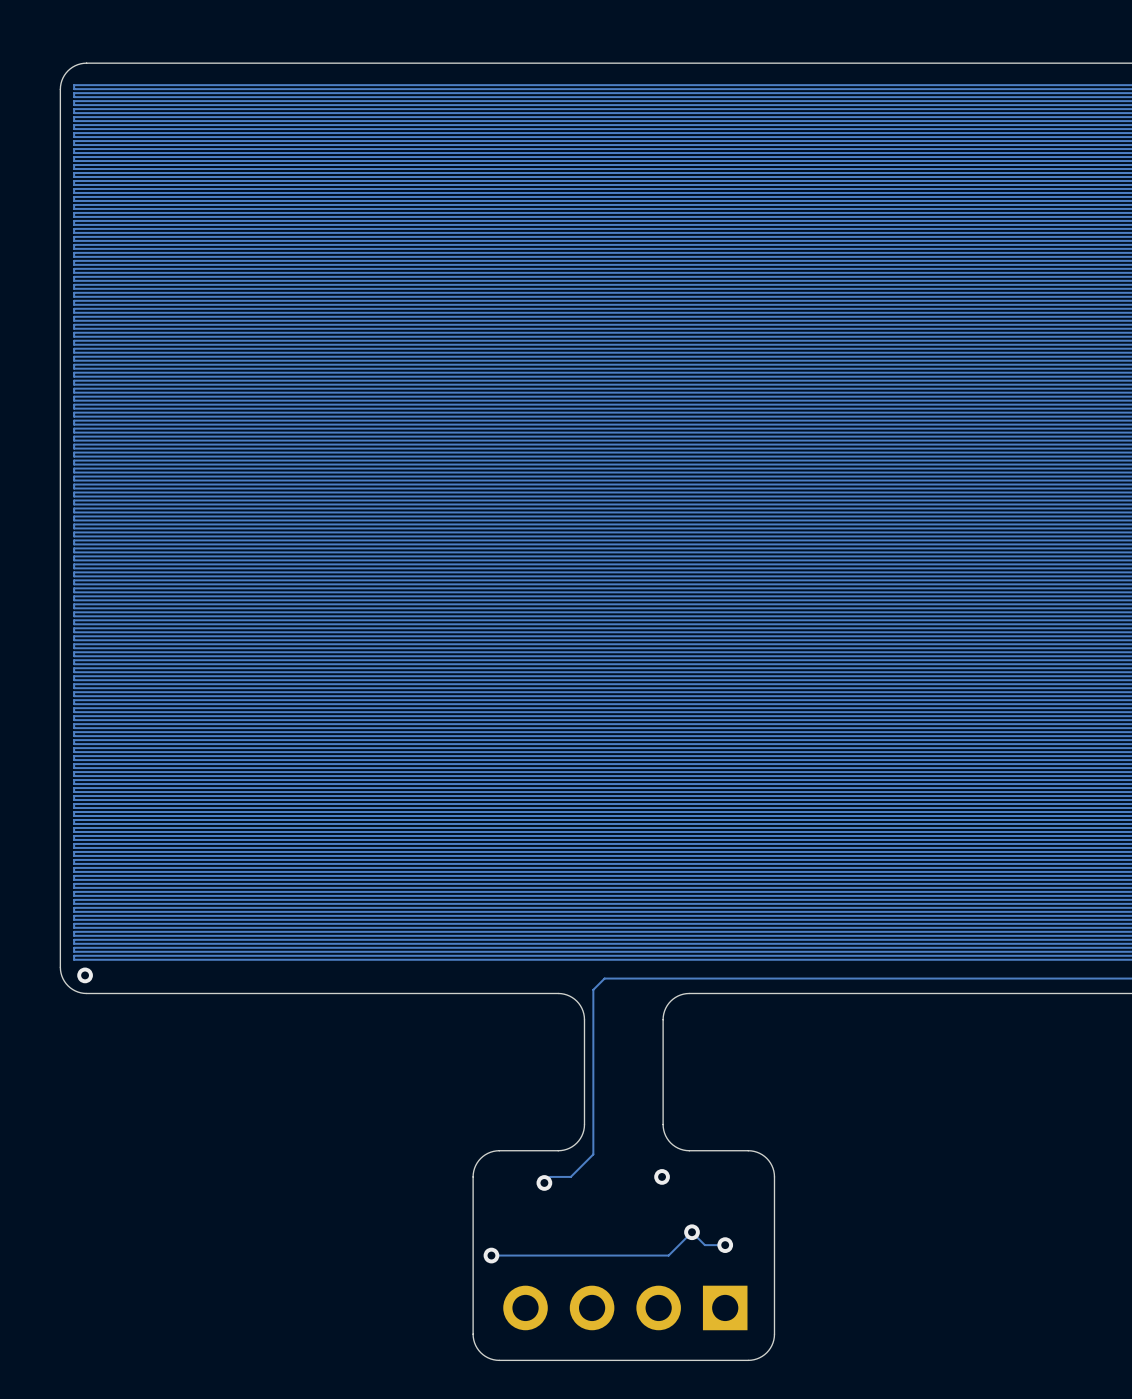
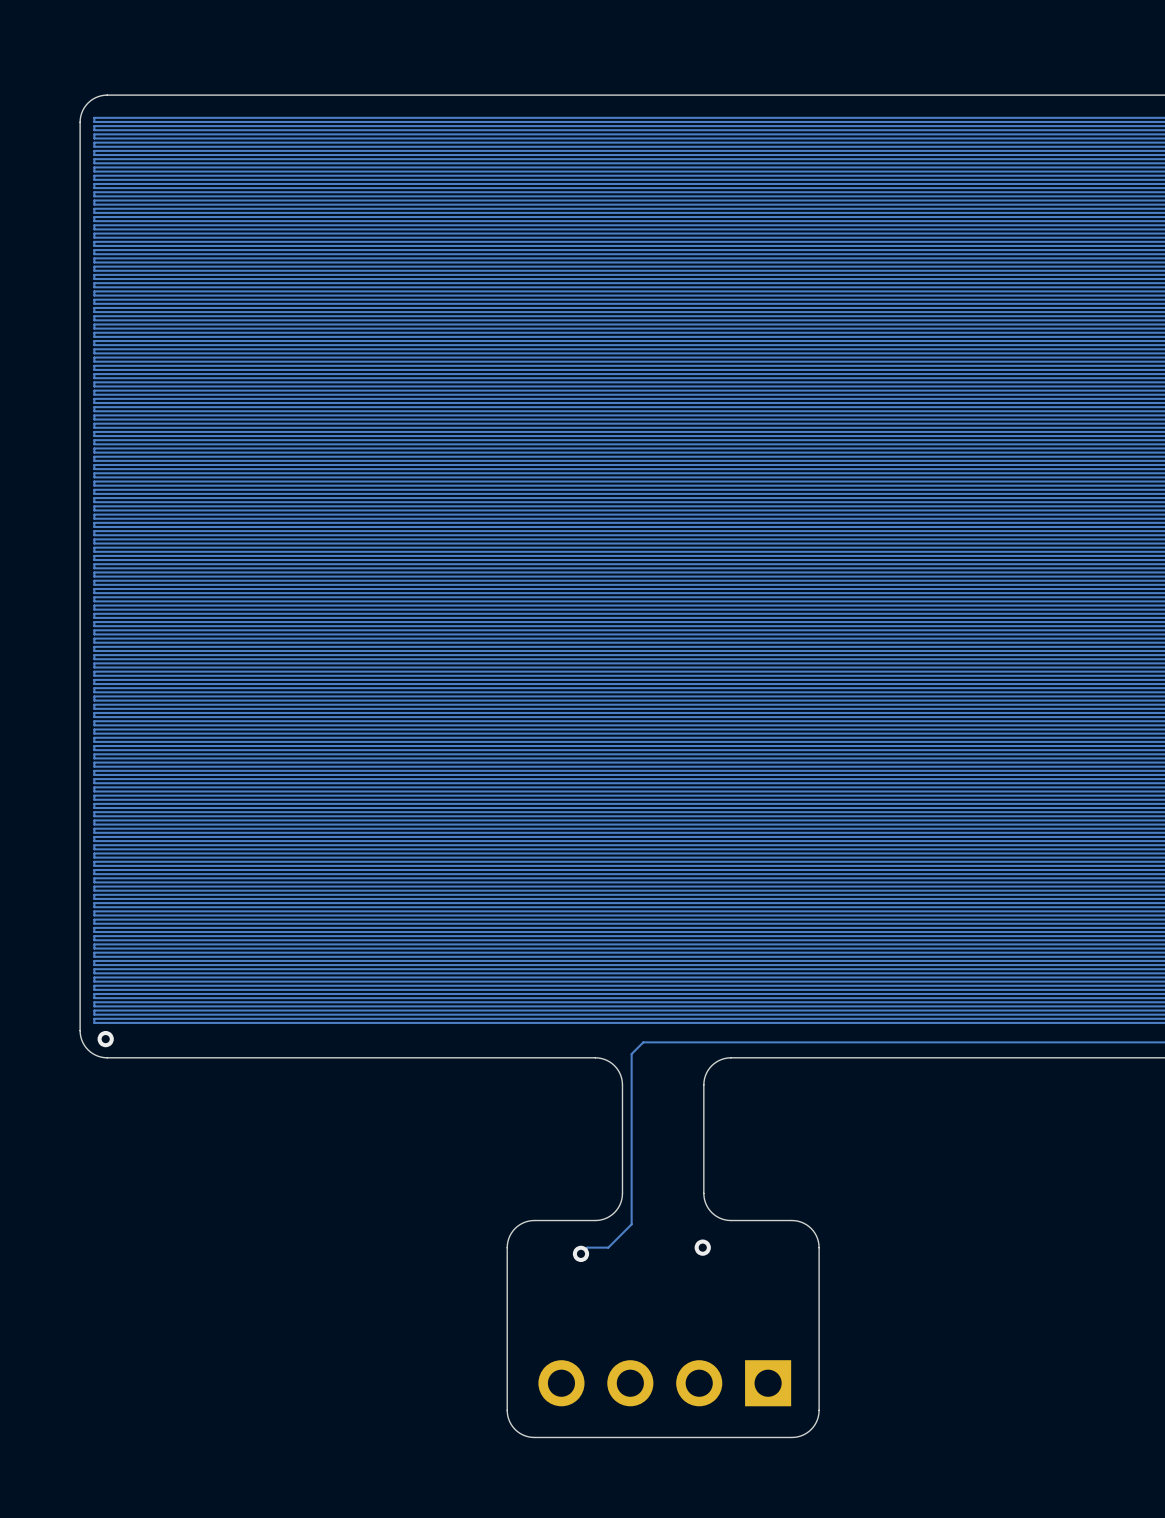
via: (692, 1232) -> none
track: (725, 1245) (704, 1245) (692, 1232) (668, 1255) (491, 1255) -> none
via: (725, 1245) -> none
via: (491, 1255) -> none

